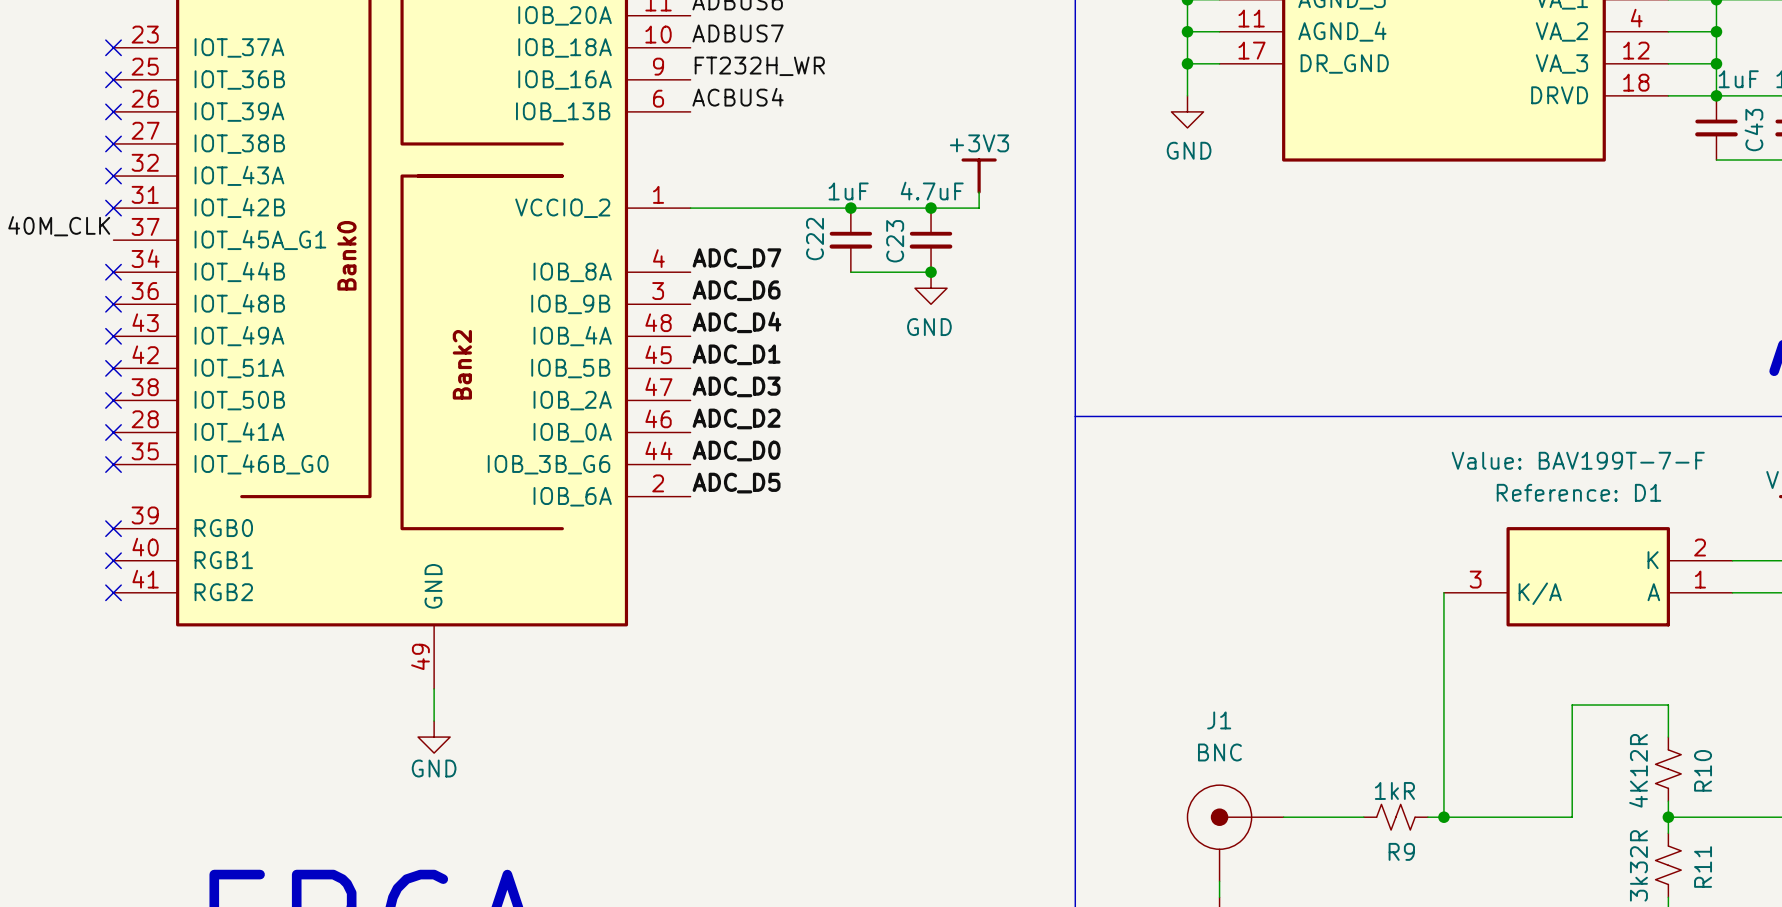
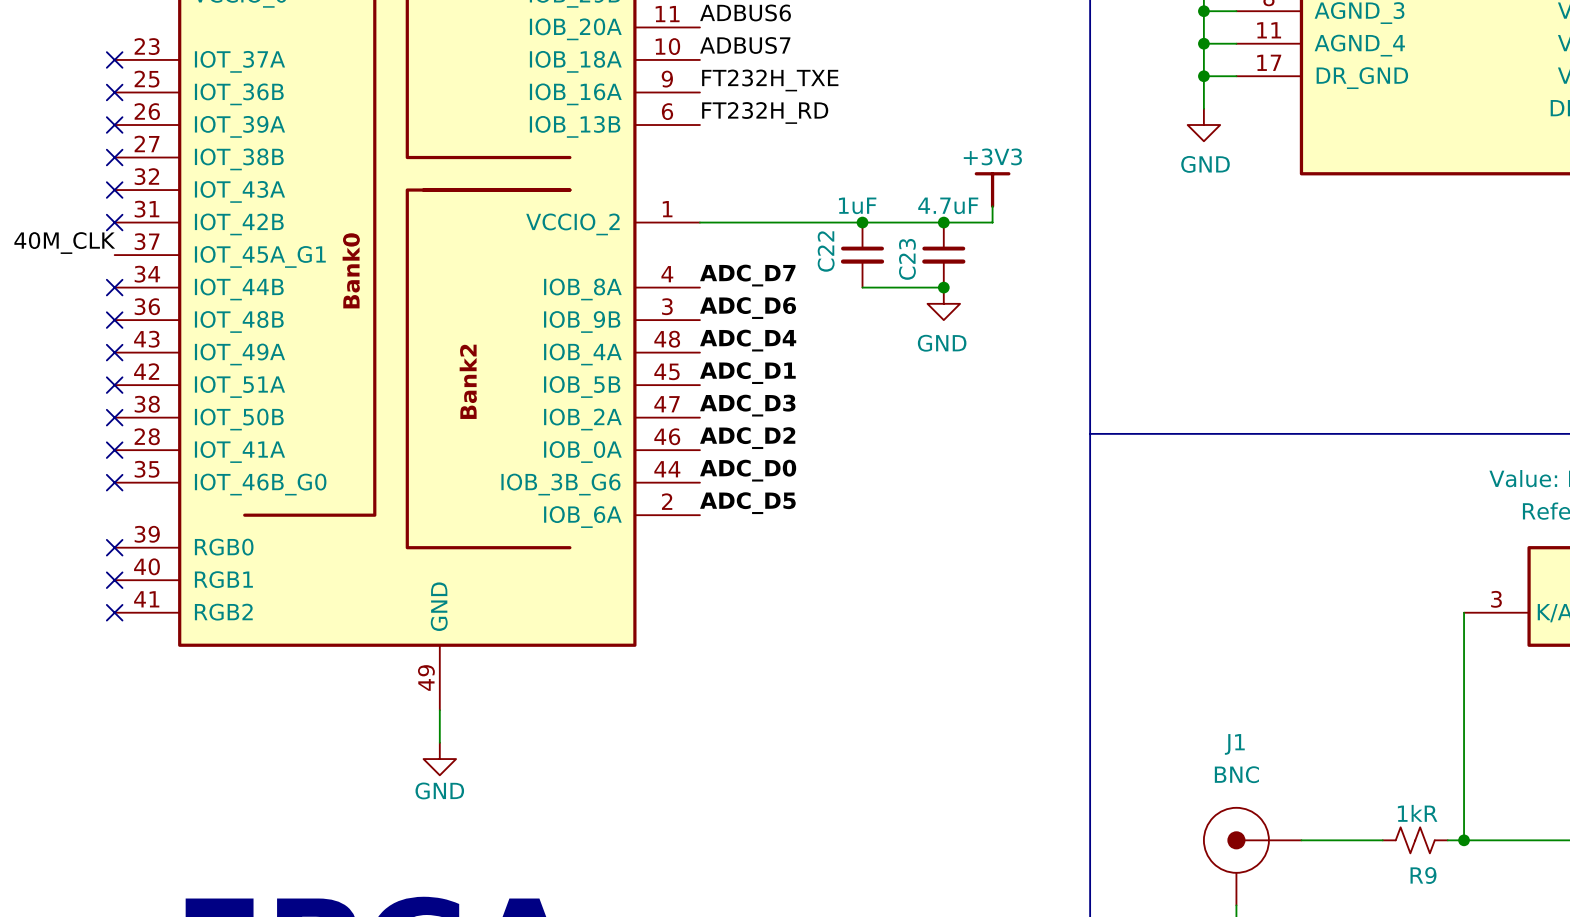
label: FT232H_WR (759, 66) -> FT232H_TXE (770, 80)
label: ACBUS4 (738, 97) -> FT232H_RD (765, 112)

